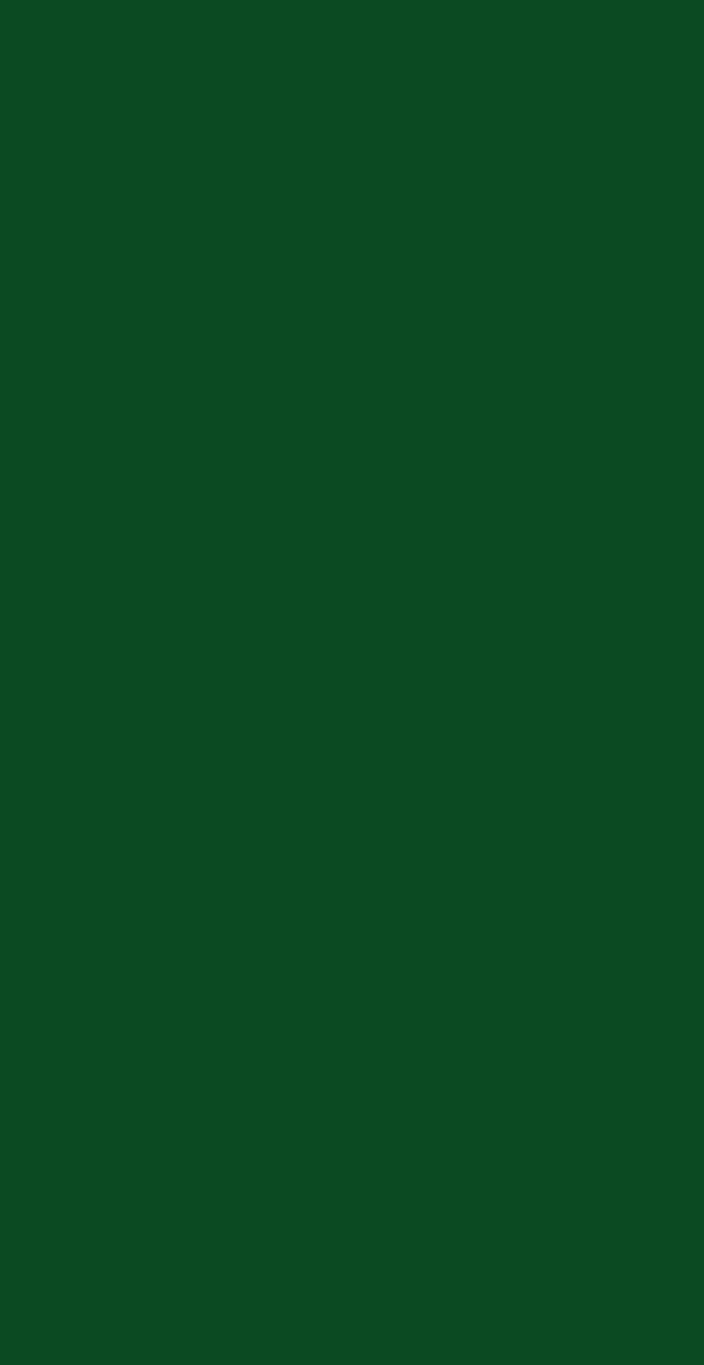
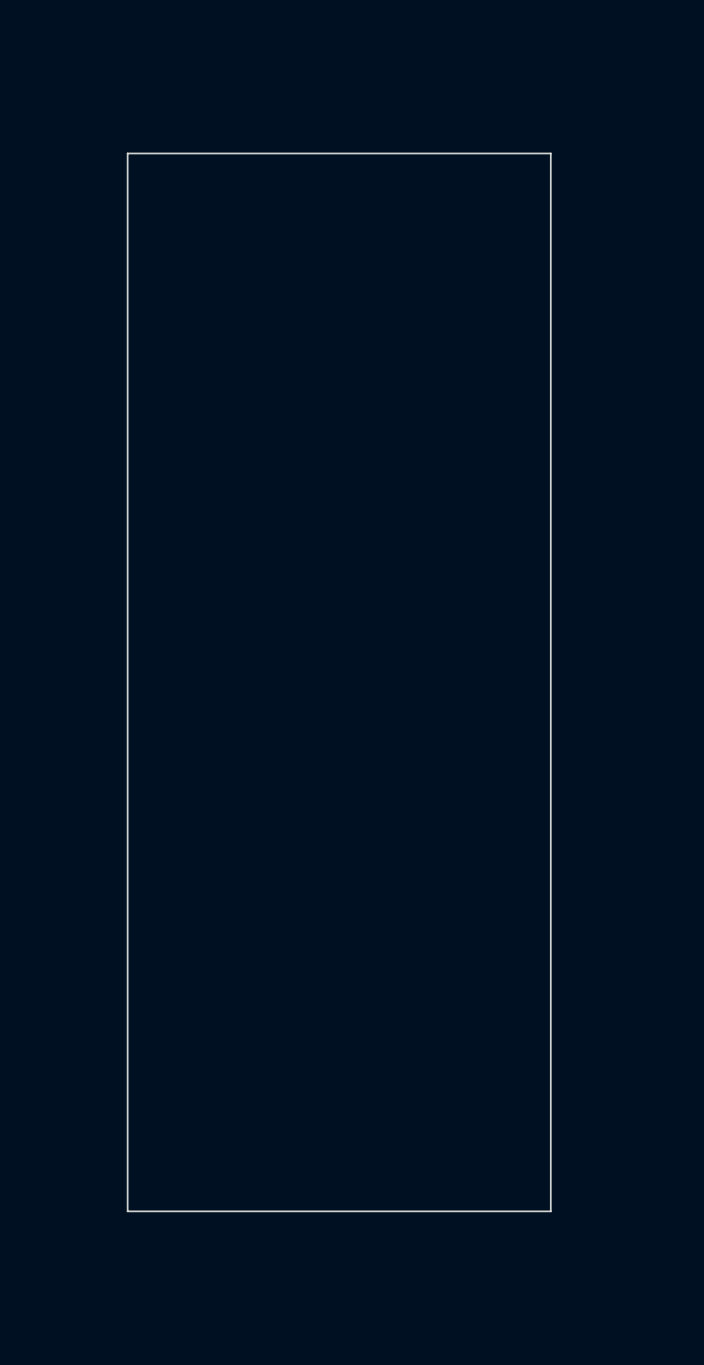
board edge: none -> (550, 153) (127, 153) (127, 1211) (550, 1211) (550, 153)

